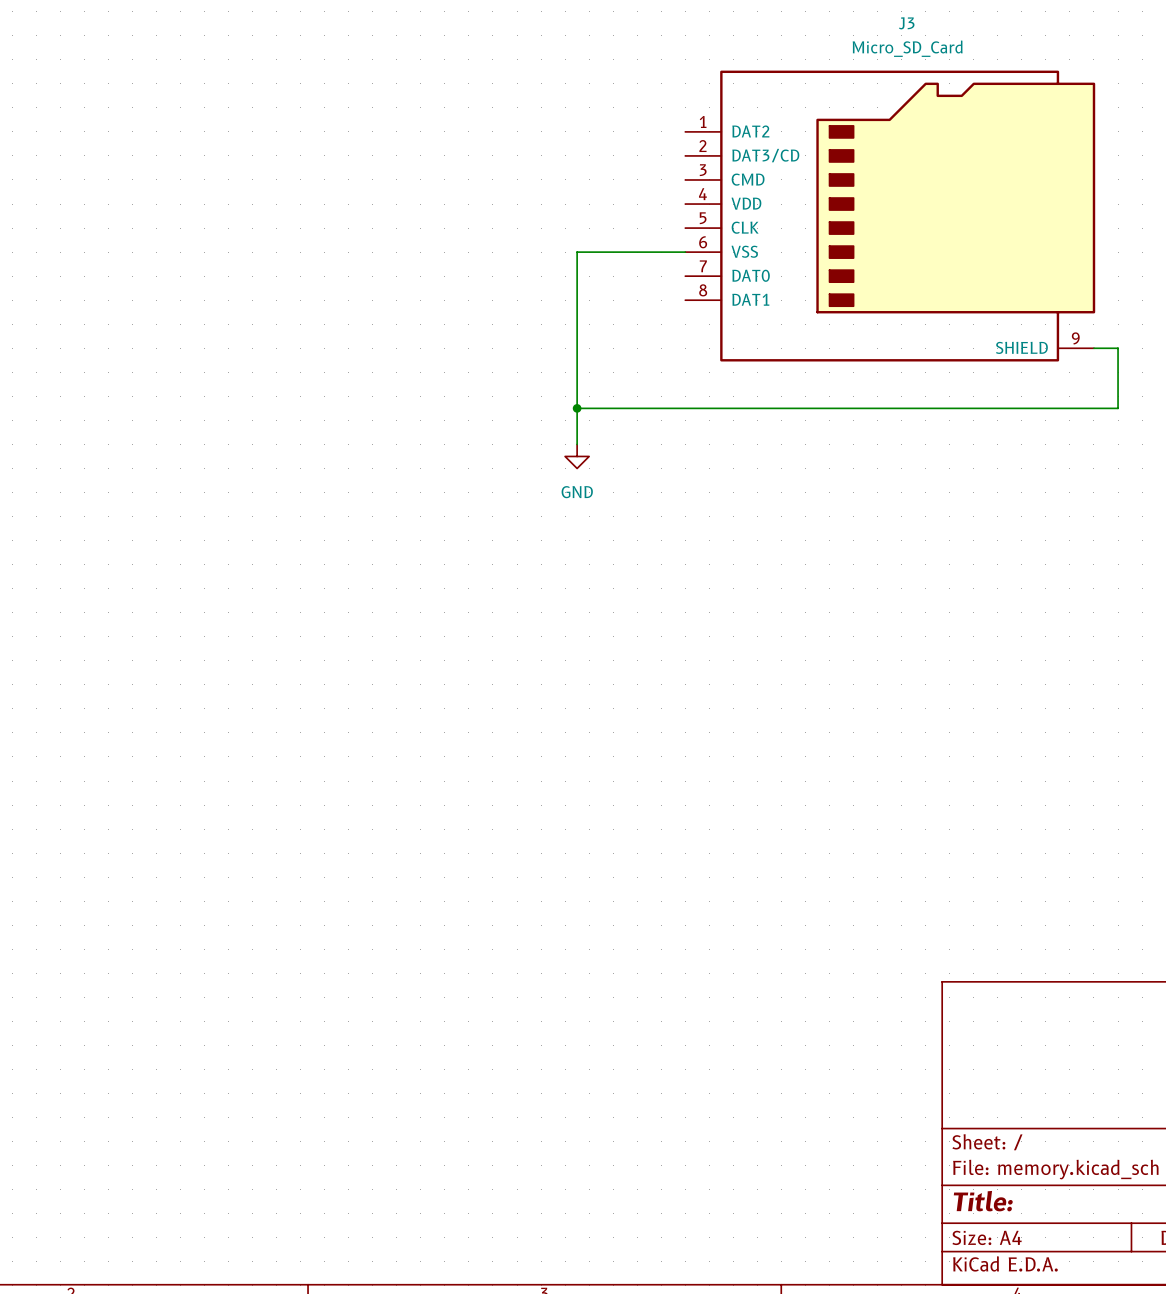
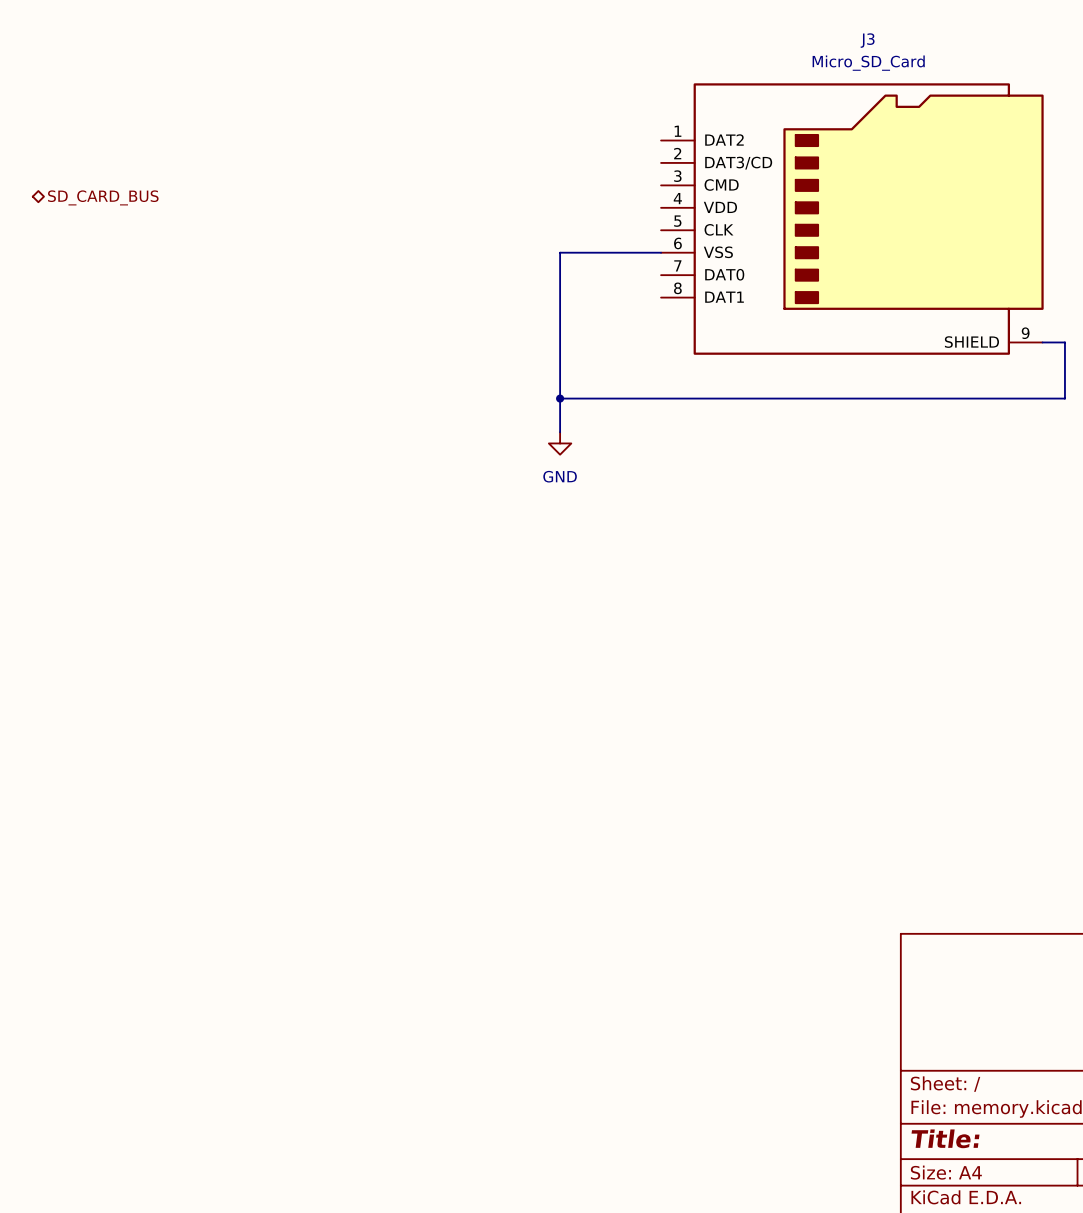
hierarchical label: none -> SD_CARD_BUS (103, 197)

